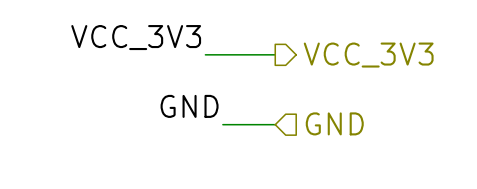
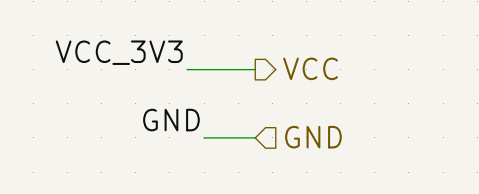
hierarchical label: VCC_3V3 (368, 55) -> VCC (310, 68)

